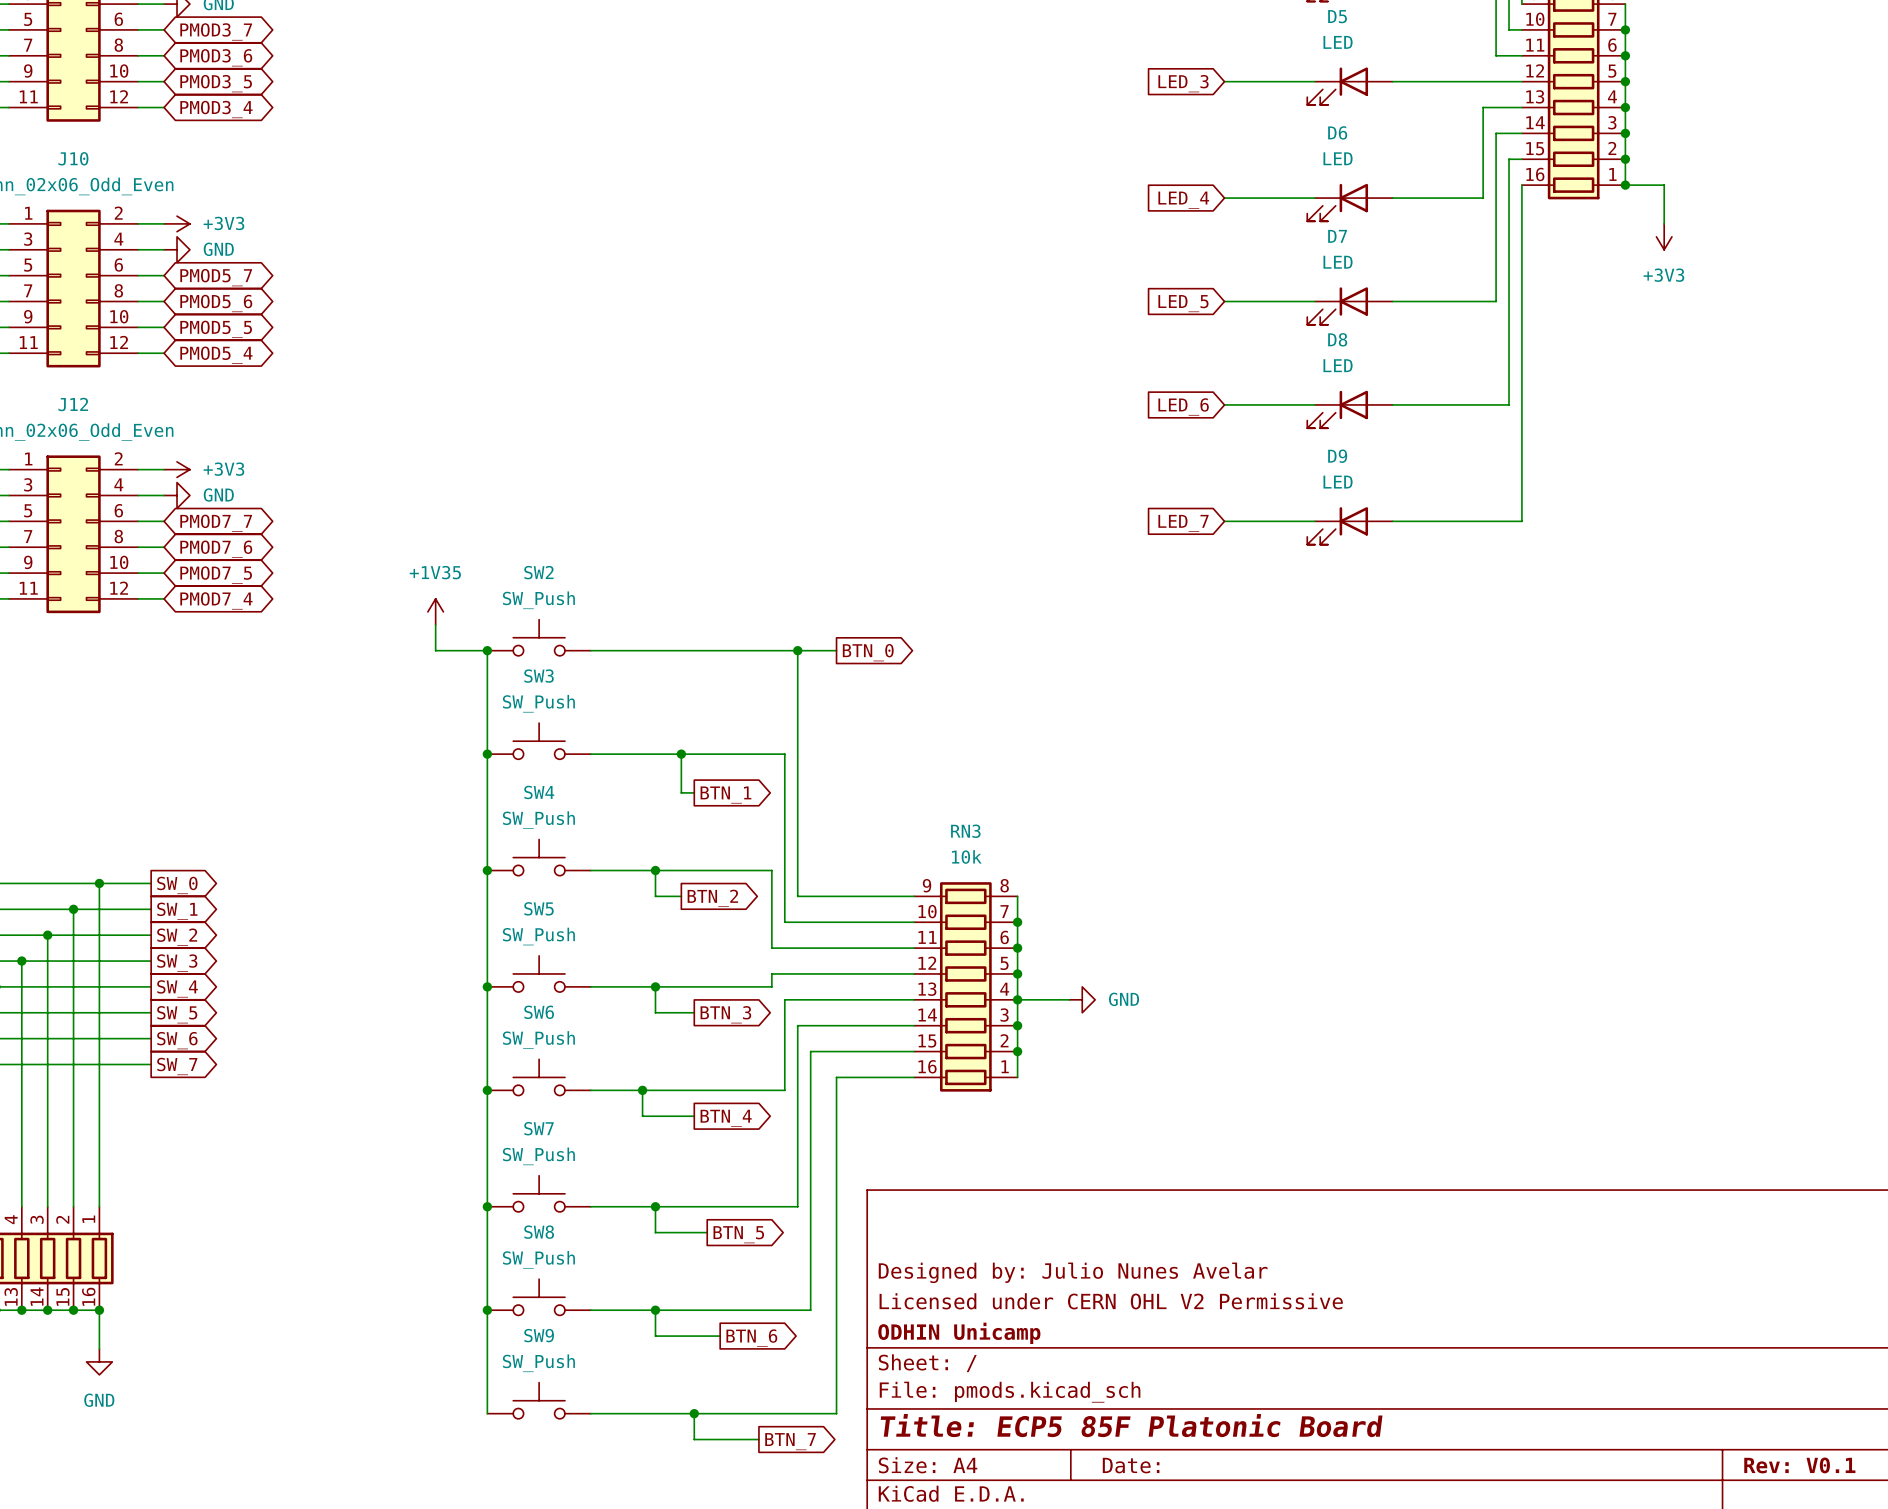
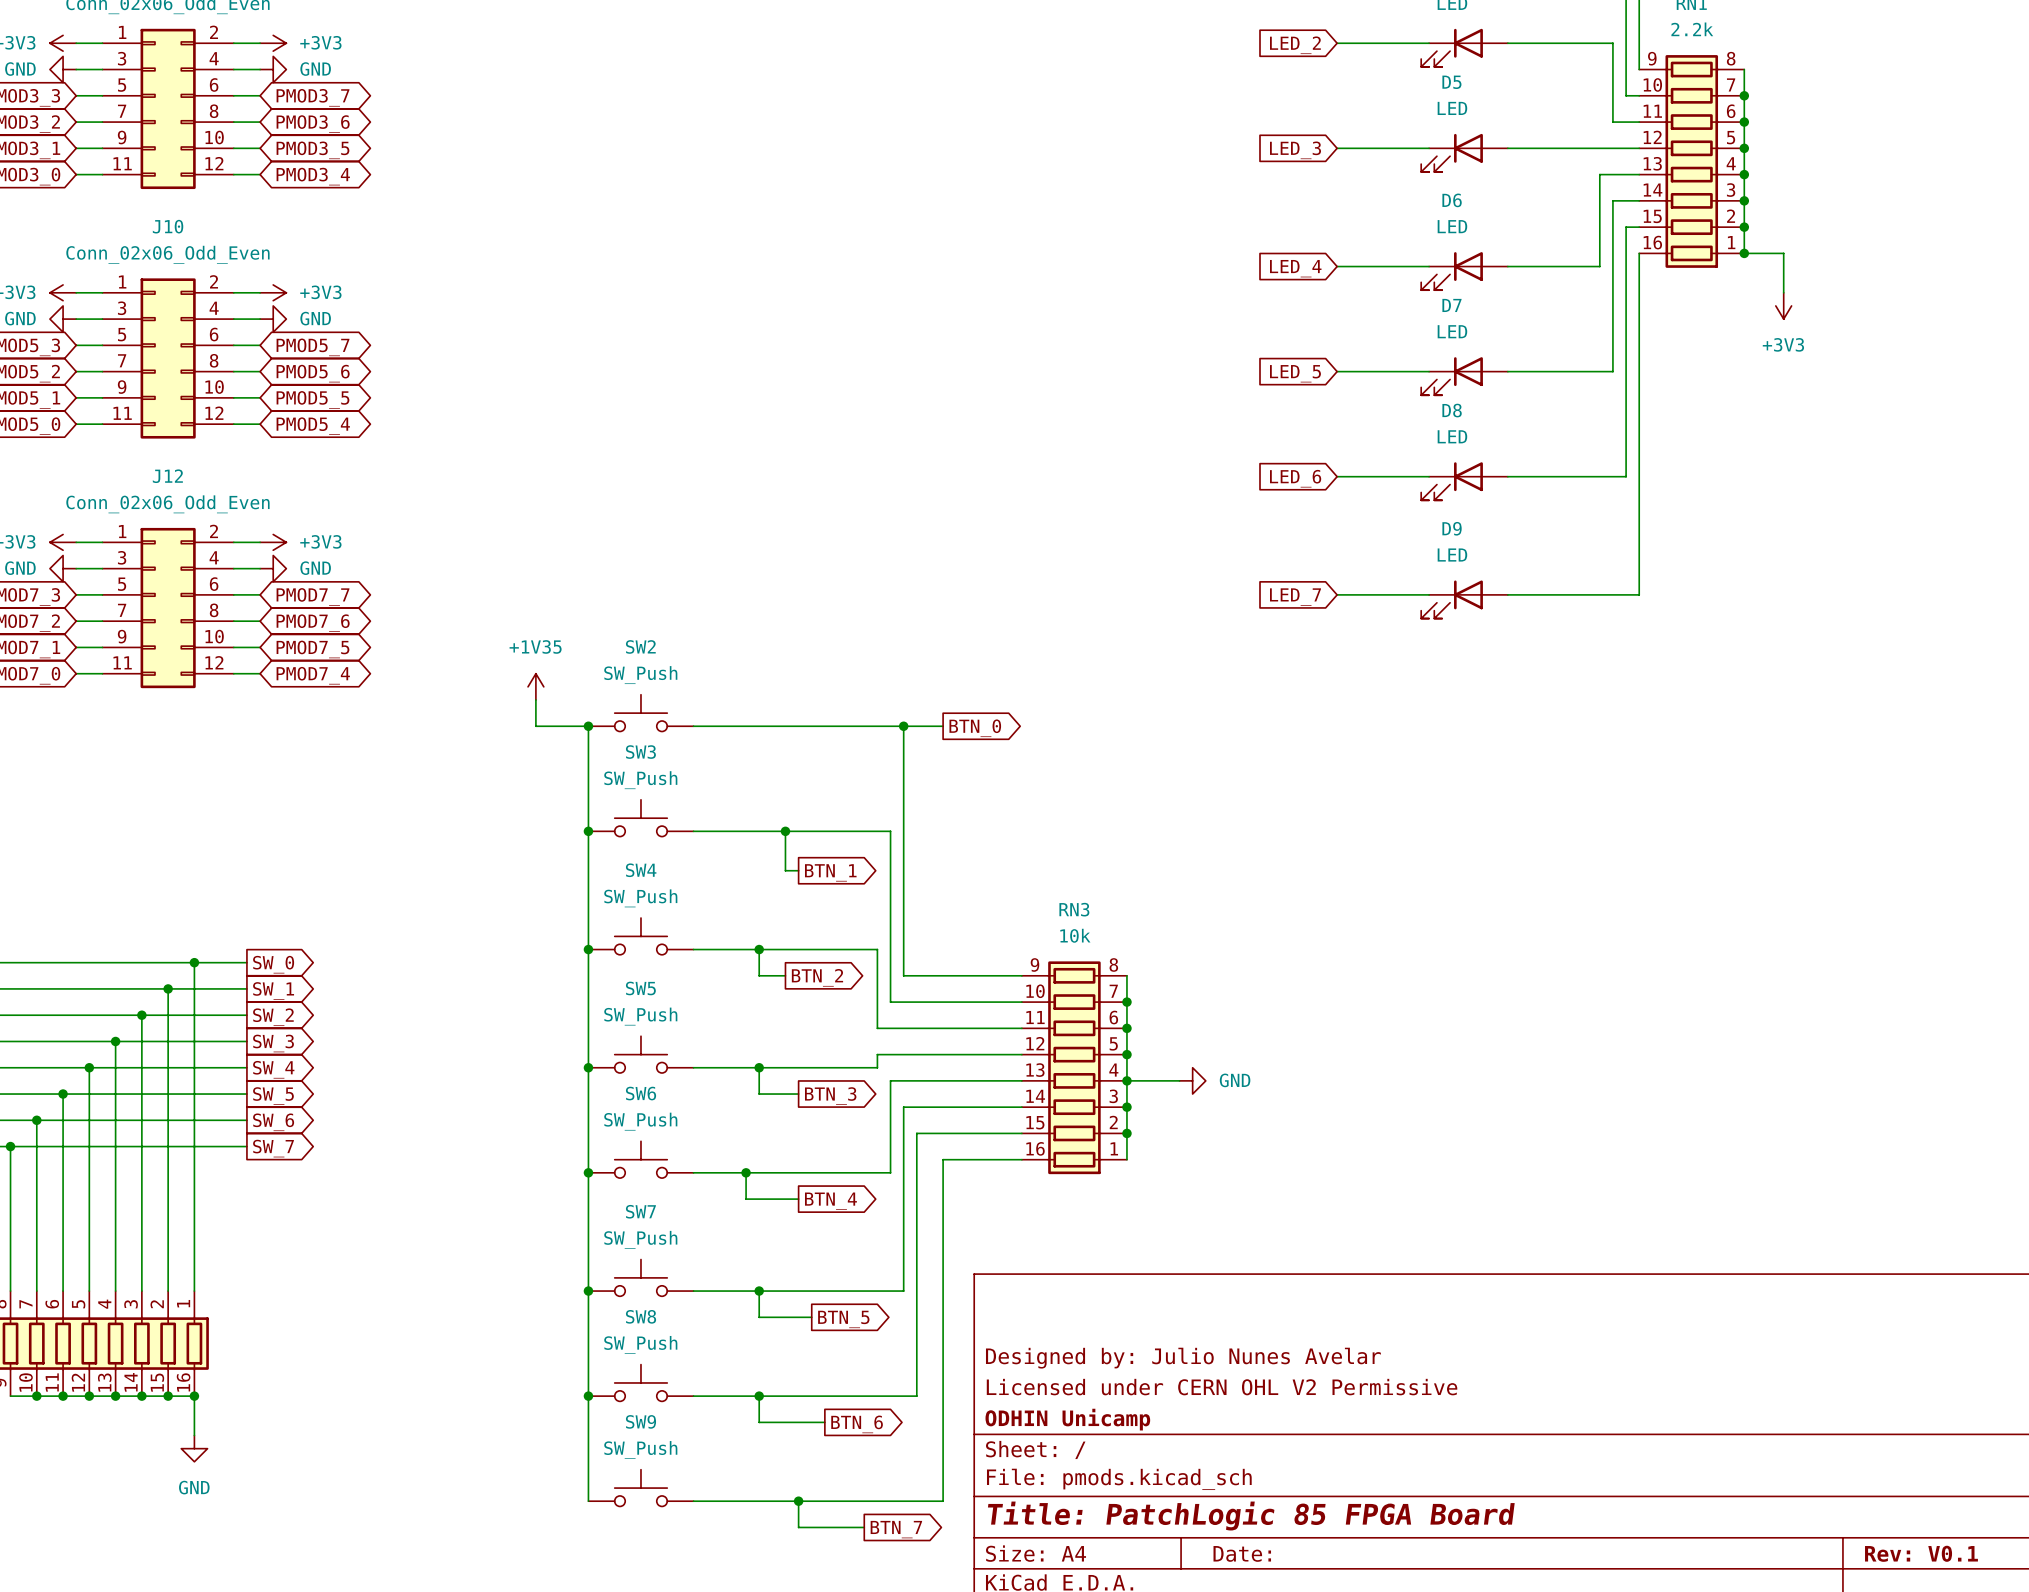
title block: Title: ECP5 85F Platonic Board (1131, 1425) -> Title: PatchLogic 85 FPGA Board (1251, 1516)

